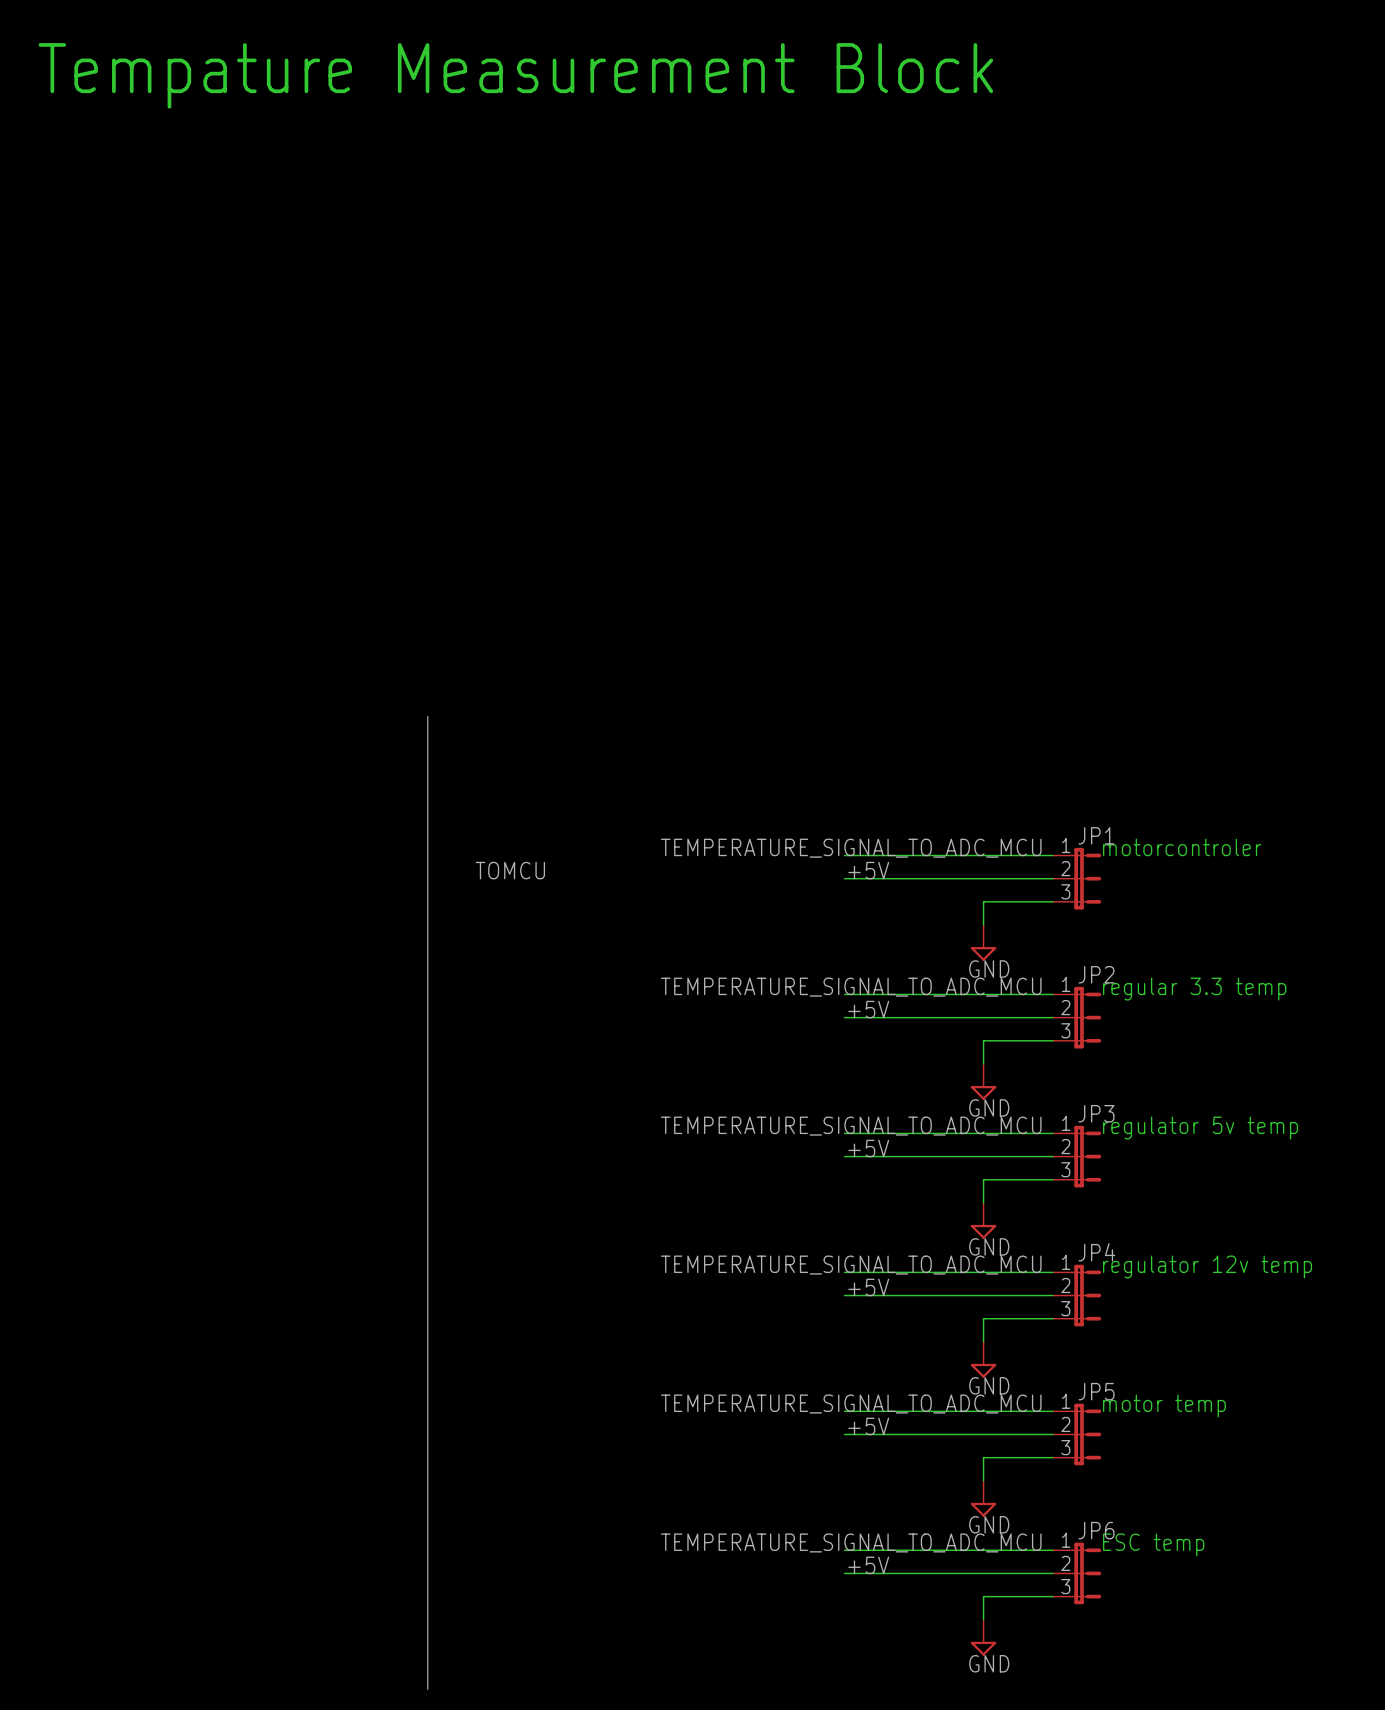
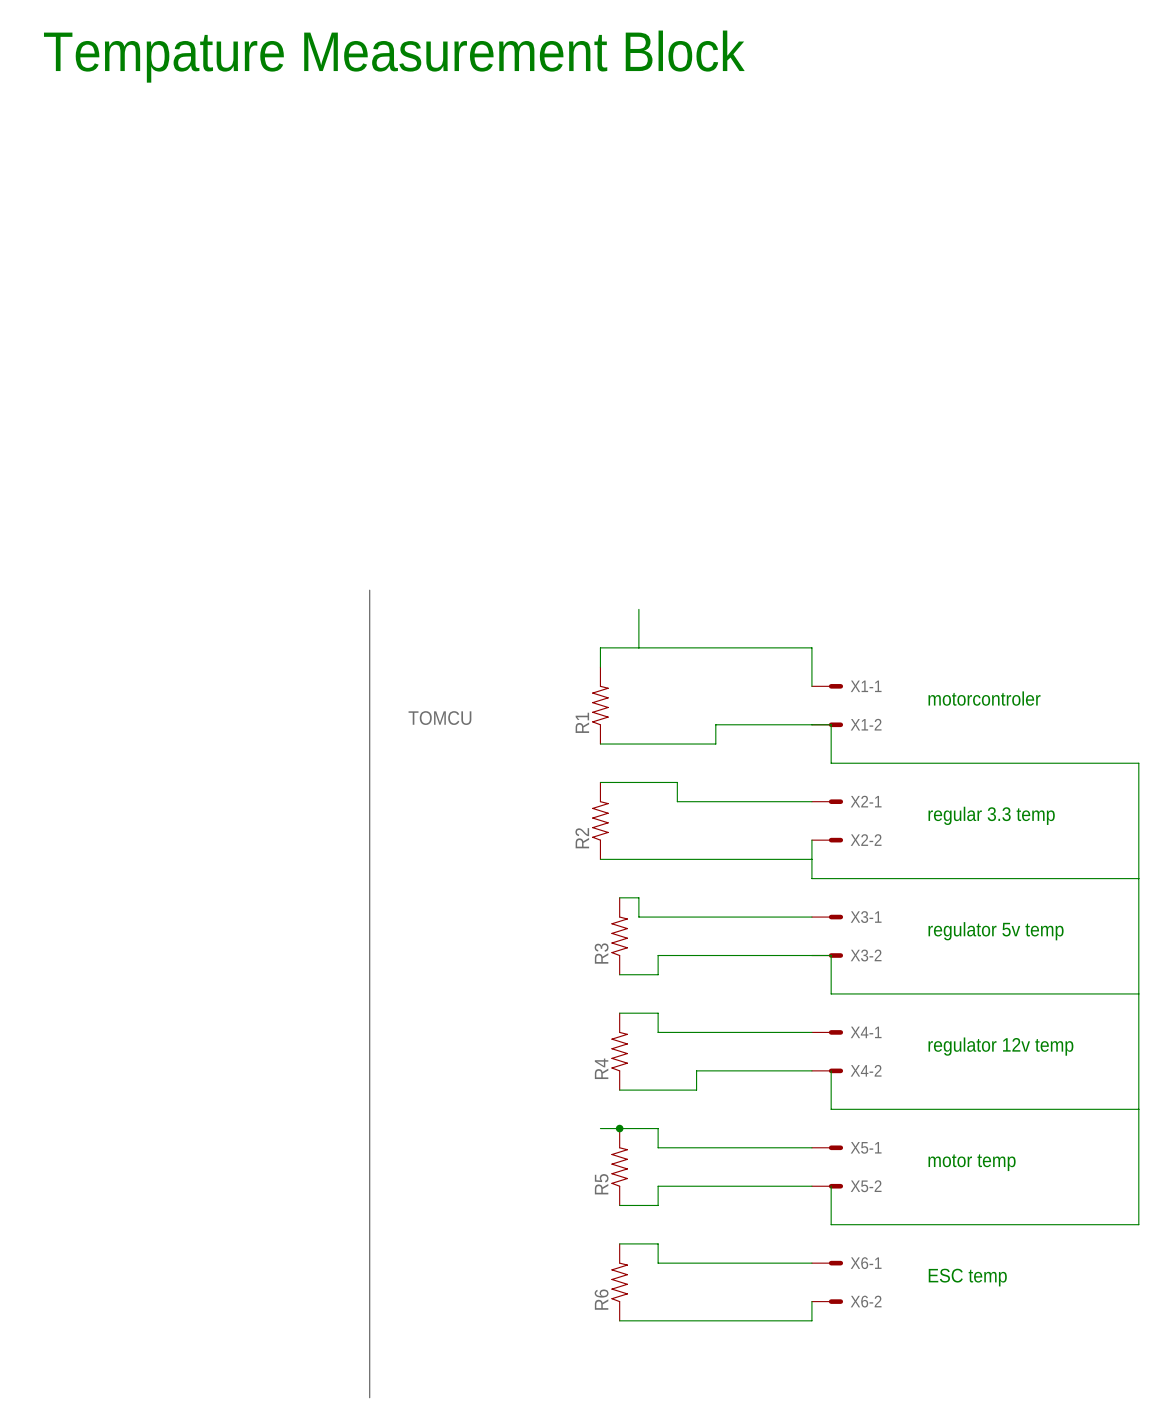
wire: none -> (638, 609) (638, 647)
wire: none -> (600, 667) (600, 647) (811, 647) (811, 686)
X1-1: none -> (827, 686)
label: TEMPERATURE_SIGNAL_TO_ADC_MCU (851, 848) -> none
R1: none -> (600, 705)
wire: (844, 855) (1053, 855) -> none
label: +5V (868, 870) -> none
wire: none -> (715, 724) (715, 744) (600, 744)
X1-2: none -> (827, 724)
wire: (983, 878) (1053, 878) -> (831, 724) (831, 744)
JP1: (1077, 878) -> none
wire: (983, 901) (1053, 901) -> none
wire: none -> (831, 763) (1138, 763) (1138, 1224) (831, 1224)
power symbol: GND (983, 942) -> none
wire: none -> (600, 782) (677, 782) (677, 801) (811, 801)
X2-1: none -> (827, 801)
label: TEMPERATURE_SIGNAL_TO_ADC_MCU (851, 987) -> none
R2: none -> (600, 820)
wire: (844, 994) (1053, 994) -> none
label: +5V (868, 1009) -> none
wire: (844, 1017) (1053, 1017) -> none
wire: none -> (811, 840) (811, 878) (1138, 878)
X2-2: none -> (827, 840)
JP2: (1077, 1017) -> none
wire: none -> (600, 859) (811, 859)
wire: (1053, 1040) (983, 1040) (983, 1063) -> none
power symbol: GND (983, 1081) -> none
wire: none -> (619, 897) (638, 897) (638, 917) (811, 917)
X3-1: none -> (827, 917)
label: TEMPERATURE_SIGNAL_TO_ADC_MCU (851, 1126) -> none
R3: none -> (619, 936)
wire: (844, 1133) (1053, 1133) -> none
label: +5V (868, 1148) -> none
wire: none -> (715, 955) (658, 955) (658, 974) (619, 974)
X3-2: none -> (827, 955)
wire: (983, 1156) (1053, 1156) -> (831, 955) (831, 974)
JP3: (1077, 1156) -> none
wire: (983, 1179) (1053, 1179) -> none
wire: none -> (831, 993) (1138, 993)
power symbol: GND (983, 1220) -> none
wire: none -> (619, 1013) (658, 1013) (658, 1032) (811, 1032)
X4-1: none -> (827, 1032)
label: TEMPERATURE_SIGNAL_TO_ADC_MCU (851, 1265) -> none
R4: none -> (619, 1051)
wire: (844, 1272) (1053, 1272) -> none
label: +5V (868, 1287) -> none
wire: none -> (715, 1070) (696, 1070) (696, 1090) (619, 1090)
wire: (960, 1295) (1053, 1295) -> none
X4-2: none -> (827, 1070)
JP4: (1077, 1295) -> none
wire: (983, 1318) (1053, 1318) -> (831, 1090) (831, 1070)
wire: none -> (831, 1109) (1138, 1109)
power symbol: GND (983, 1359) -> none
wire: none -> (600, 1128) (658, 1128) (658, 1147) (811, 1147)
junction: none -> (619, 1128)
X5-1: none -> (827, 1147)
label: TEMPERATURE_SIGNAL_TO_ADC_MCU (851, 1404) -> none
R5: none -> (619, 1167)
wire: (844, 1411) (1053, 1411) -> none
label: +5V (868, 1426) -> none
wire: none -> (715, 1186) (658, 1186) (658, 1205) (619, 1205)
wire: (960, 1434) (1053, 1434) -> none
X5-2: none -> (827, 1186)
JP5: (1077, 1434) -> none
wire: (983, 1457) (1053, 1457) -> (831, 1205) (831, 1186)
power symbol: GND (983, 1498) -> none
wire: none -> (619, 1243) (658, 1243) (658, 1263) (811, 1263)
X6-1: none -> (827, 1263)
label: TEMPERATURE_SIGNAL_TO_ADC_MCU (851, 1542) -> none
R6: none -> (619, 1282)
wire: (844, 1550) (1053, 1550) -> none
label: +5V (868, 1565) -> none
wire: (844, 1573) (1053, 1573) -> none
wire: none -> (811, 1301) (811, 1320) (619, 1320)
X6-2: none -> (827, 1301)
JP6: (1077, 1573) -> none
wire: (1053, 1596) (983, 1596) (983, 1619) -> none
power symbol: GND (983, 1637) -> none

